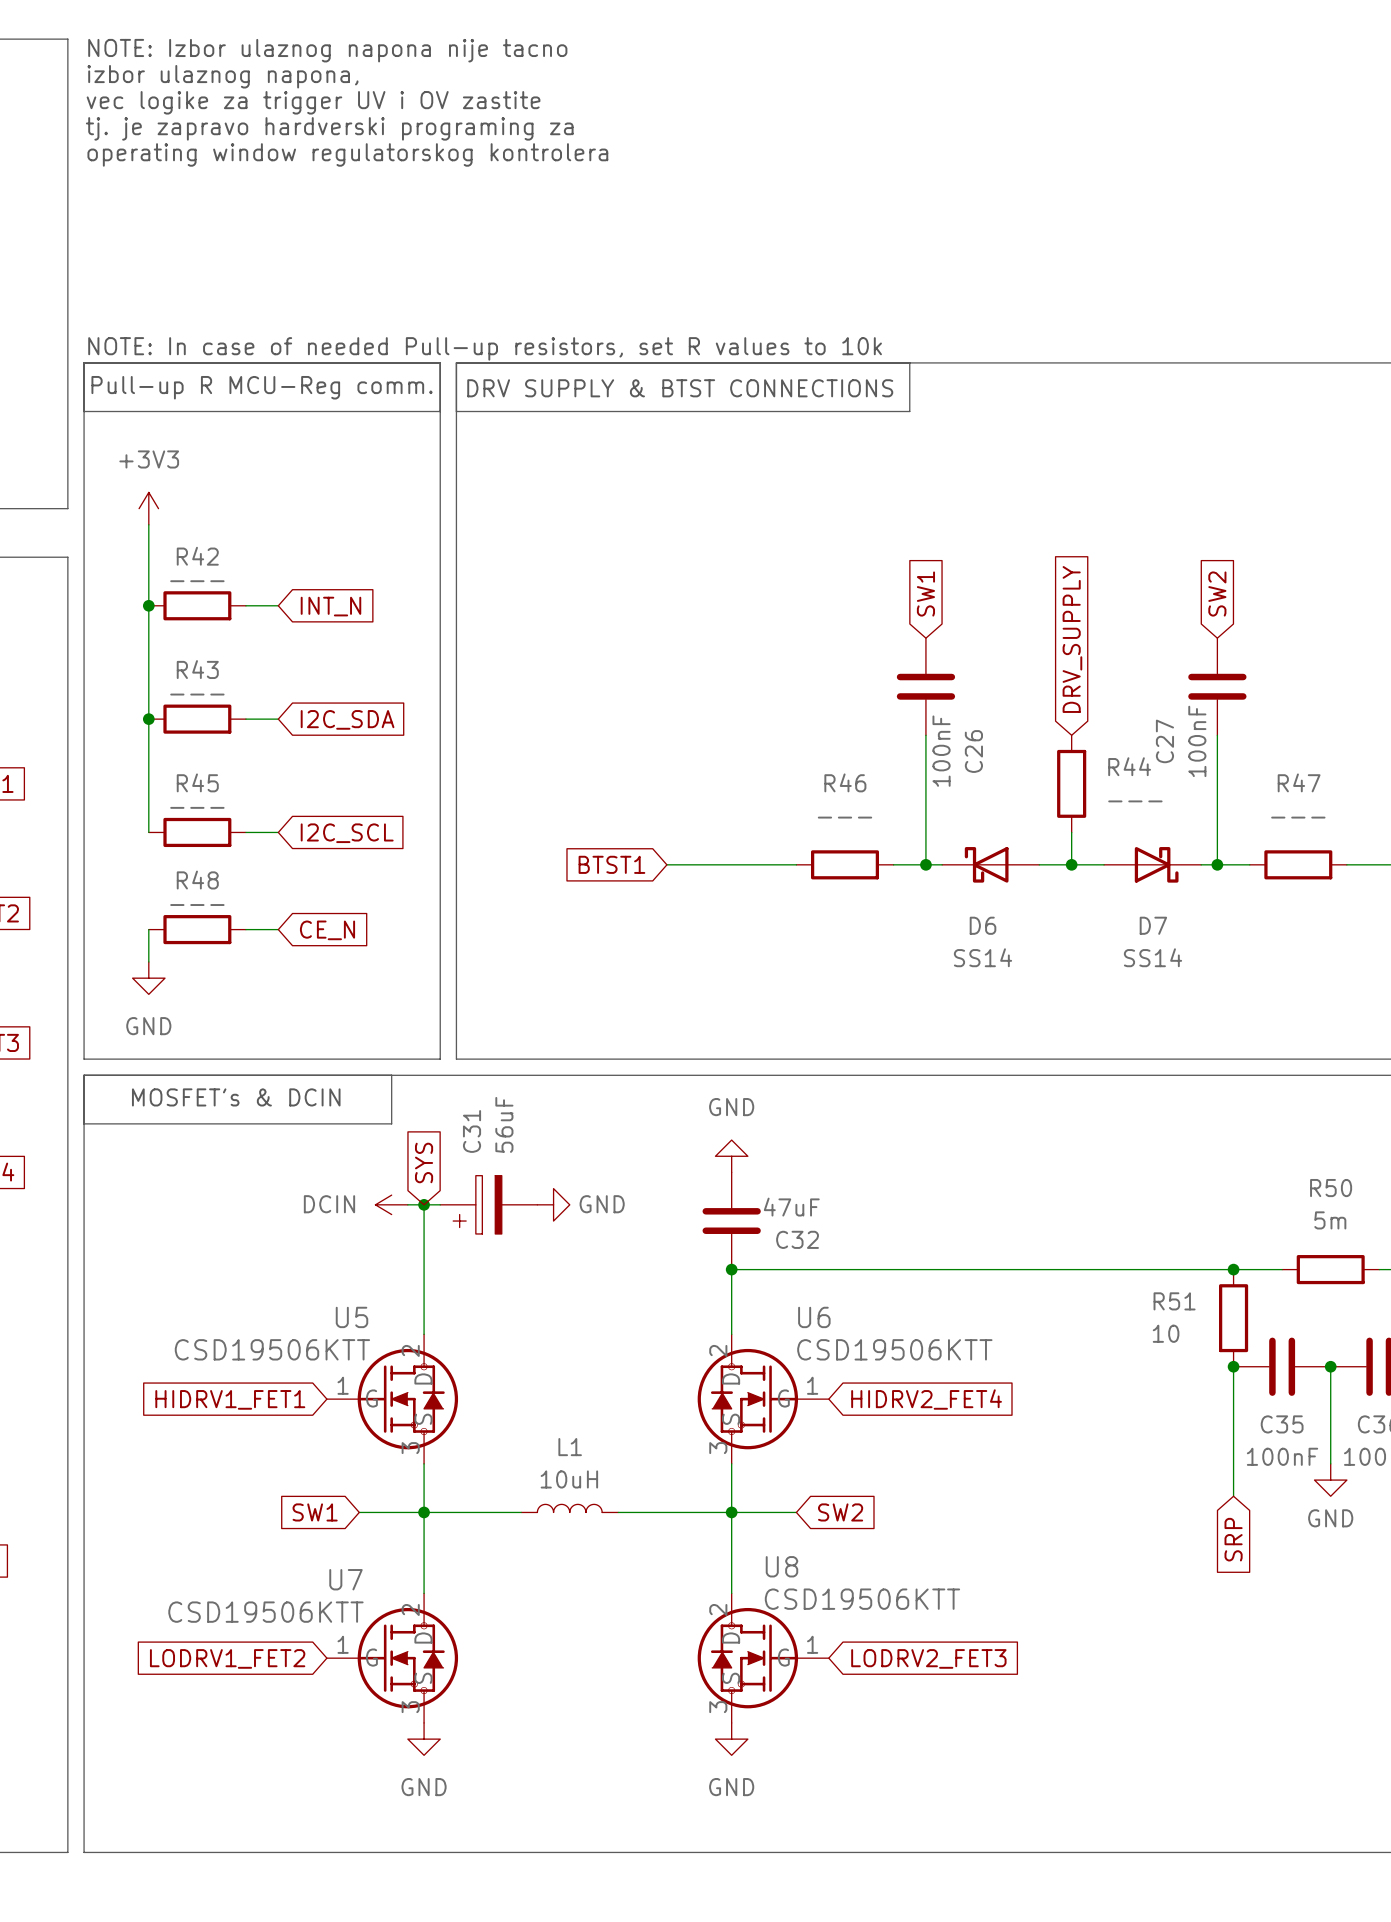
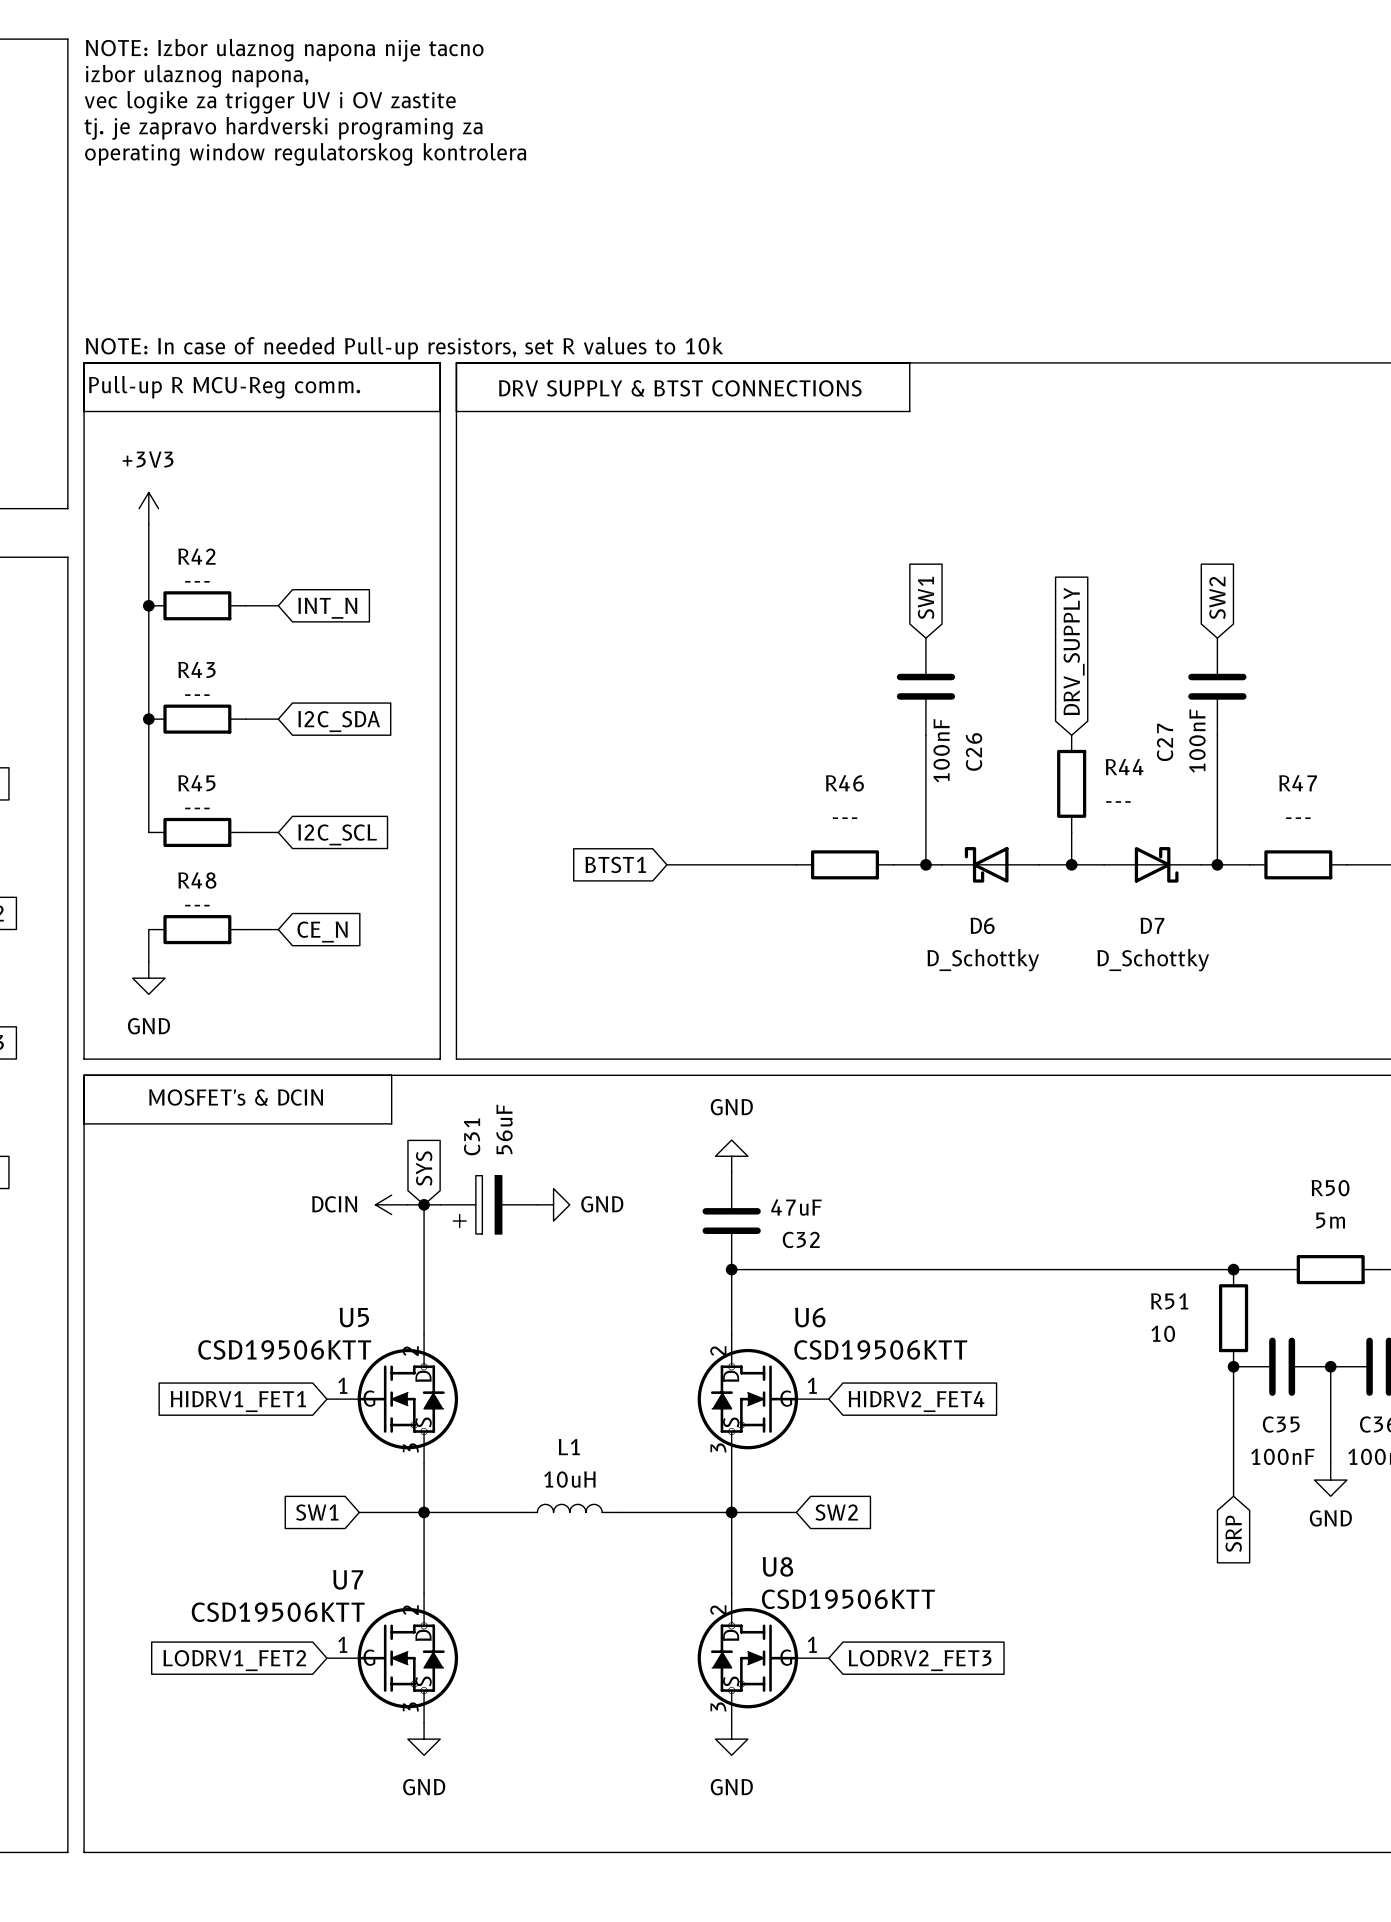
D6 value: SS14 (983, 957) -> D_Schottky (983, 960)
D7 value: SS14 (1153, 957) -> D_Schottky (1153, 960)

